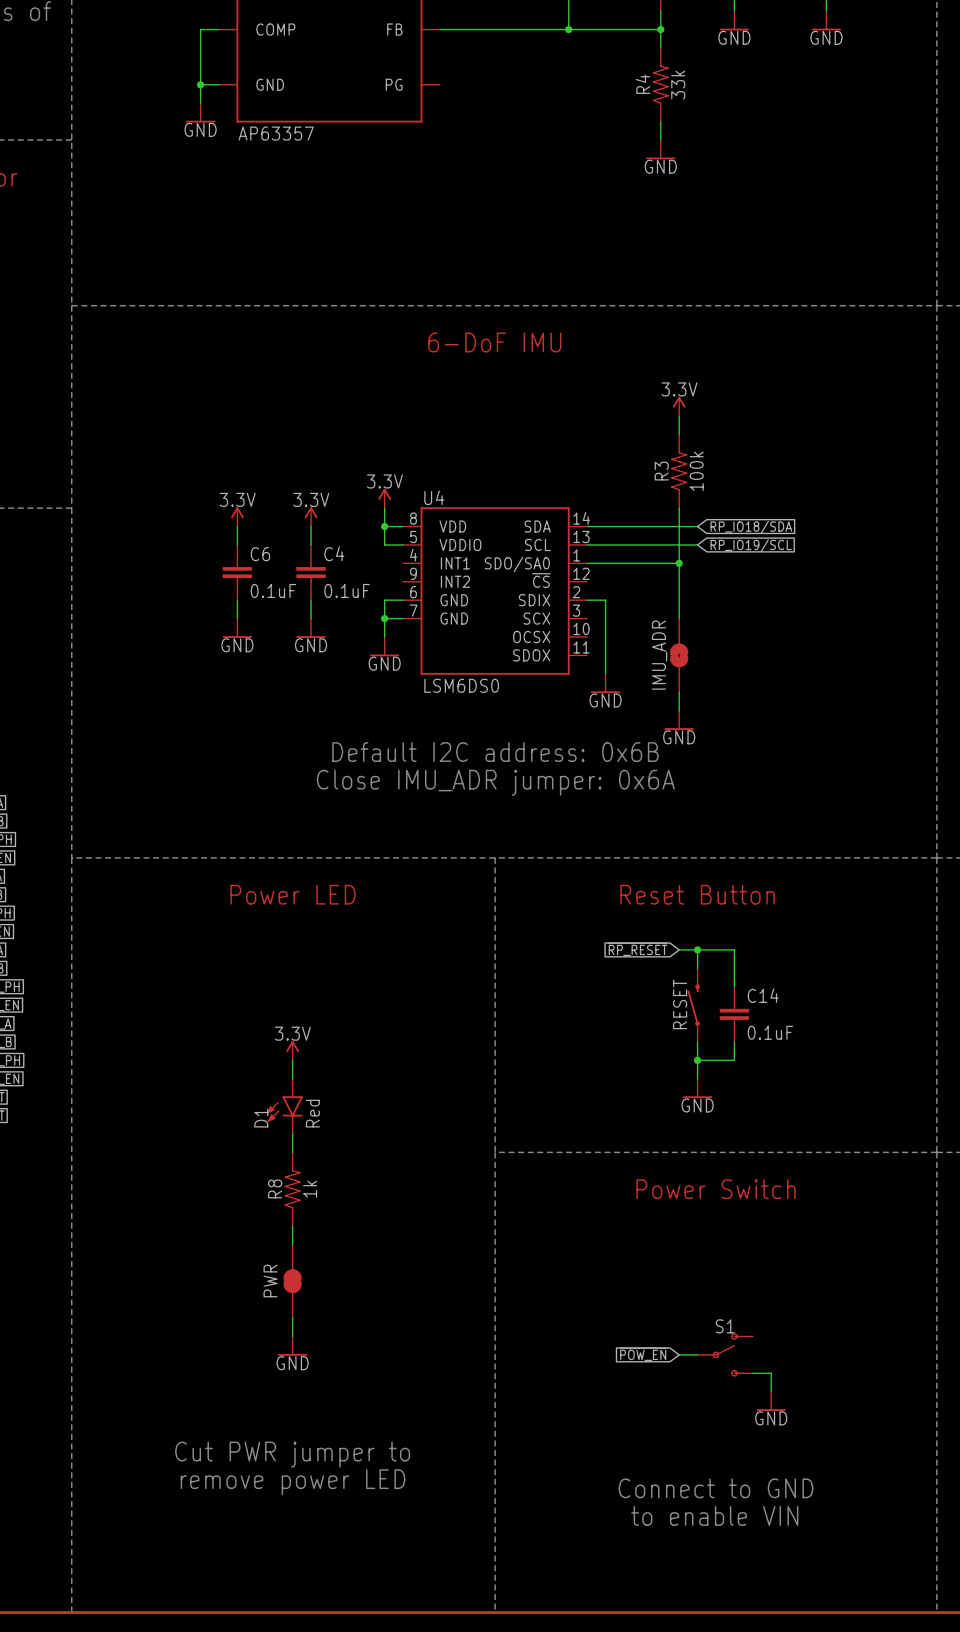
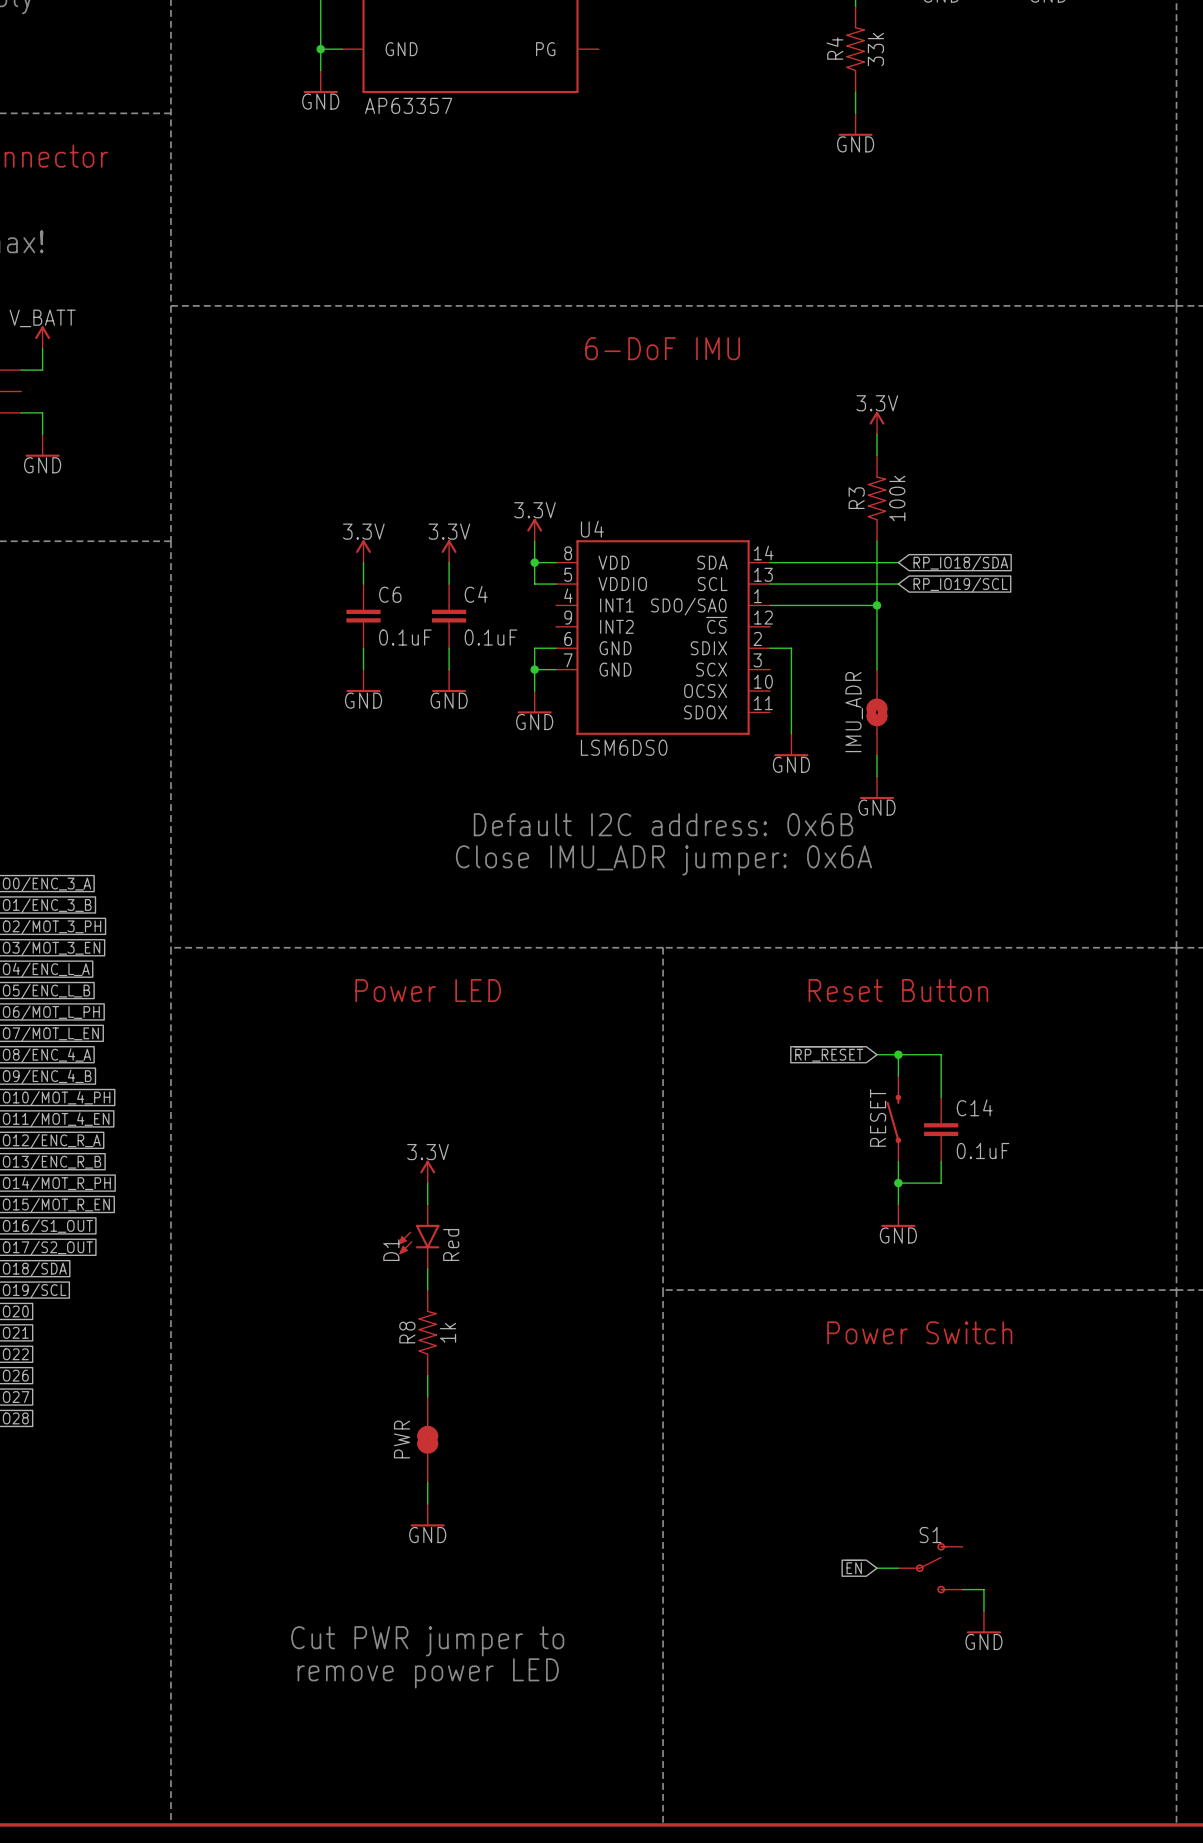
global label: ~{POW_EN} (643, 1354) -> none
wire: (679, 1354) (697, 1354) -> (876, 1568) (898, 1568)
S1 position: (725, 1354) -> (930, 1568)
wire: (752, 1373) (771, 1373) (771, 1391) -> (962, 1589) (983, 1589) (983, 1610)
global label: none -> ~{EN} (854, 1566)
power symbol position: GND (771, 1401) -> GND (983, 1622)
text: Connect to GND (716, 1488) -> none
text: to enable VIN (714, 1515) -> none

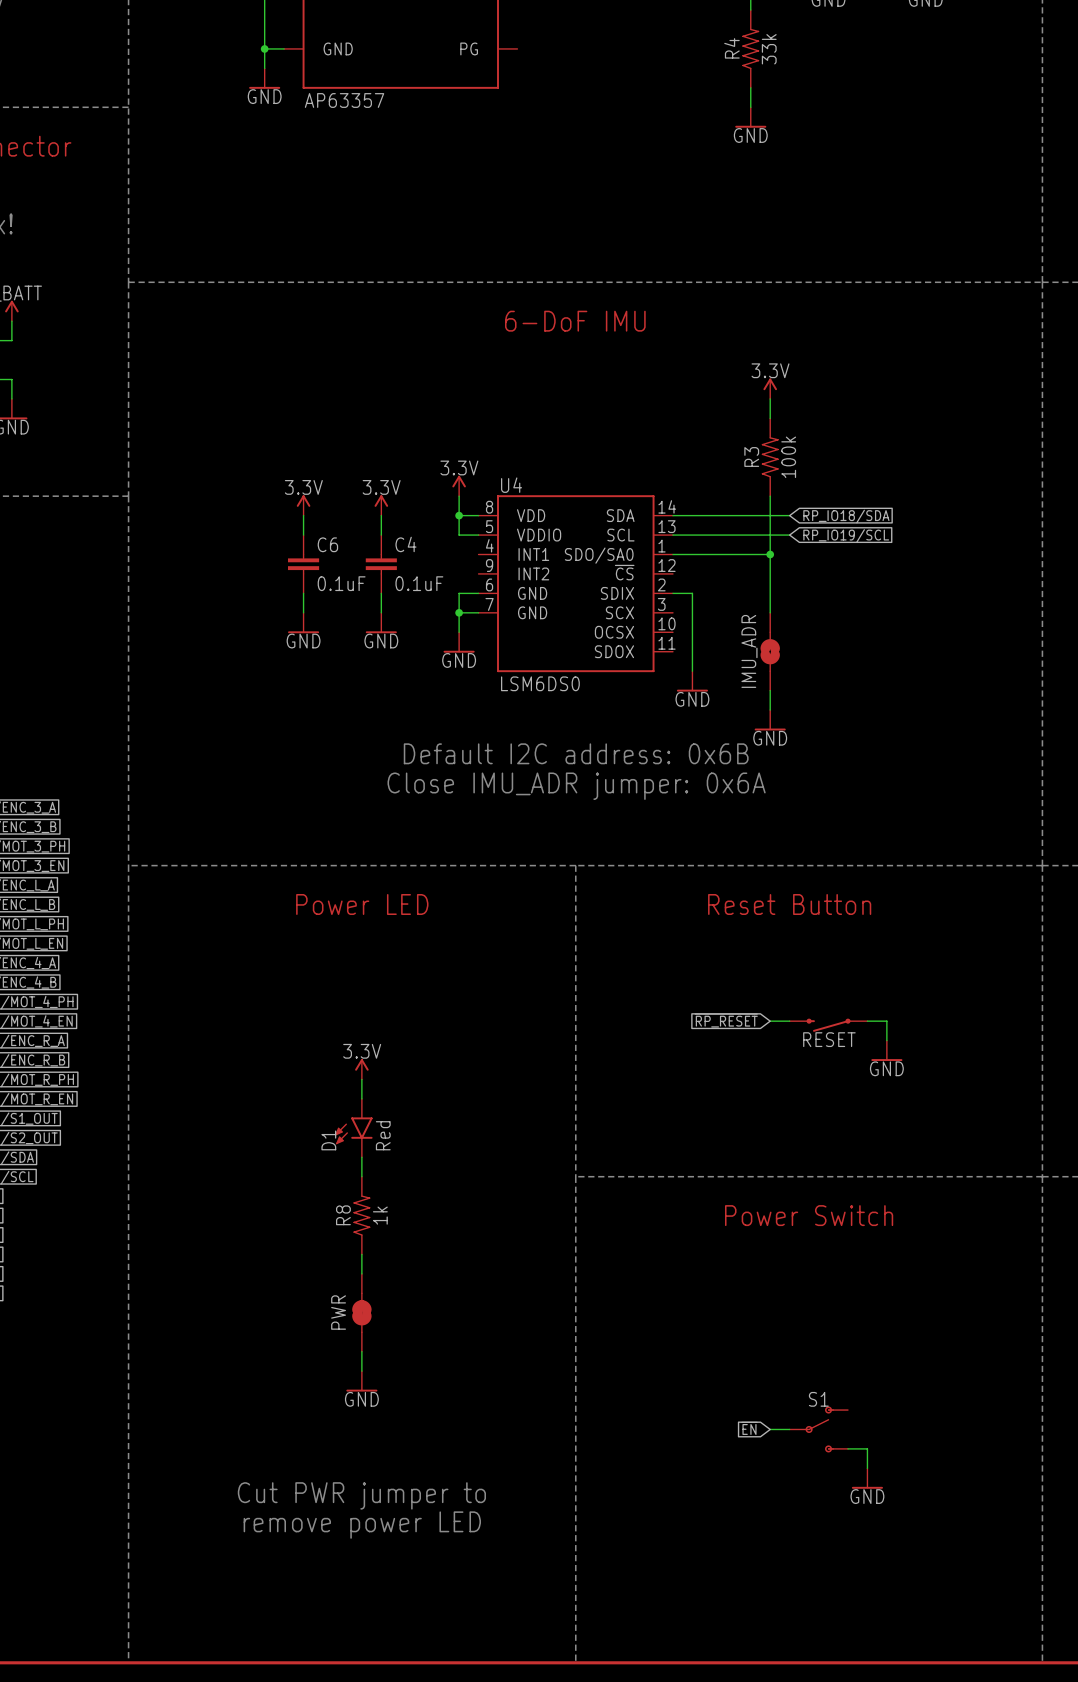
global label position: ~{RP_RESET} (828, 1054) -> ~{RP_RESET} (726, 1020)
wire: (876, 1054) (941, 1054) (941, 1097) -> none
wire: (898, 1054) (898, 1076) -> none
junction: (898, 1054) -> none
wire: none -> (770, 1021) (789, 1021)
RESET rotation: 0° (893, 1118) -> 90° counterclockwise (828, 1025)
wire: none -> (867, 1021) (886, 1021) (886, 1040)
C14: 0.1uF (941, 1129) -> none
wire: (898, 1161) (898, 1204) -> none
wire: (941, 1161) (941, 1183) (898, 1183) -> none
junction: (898, 1183) -> none
power symbol position: GND (898, 1215) -> GND (886, 1050)

